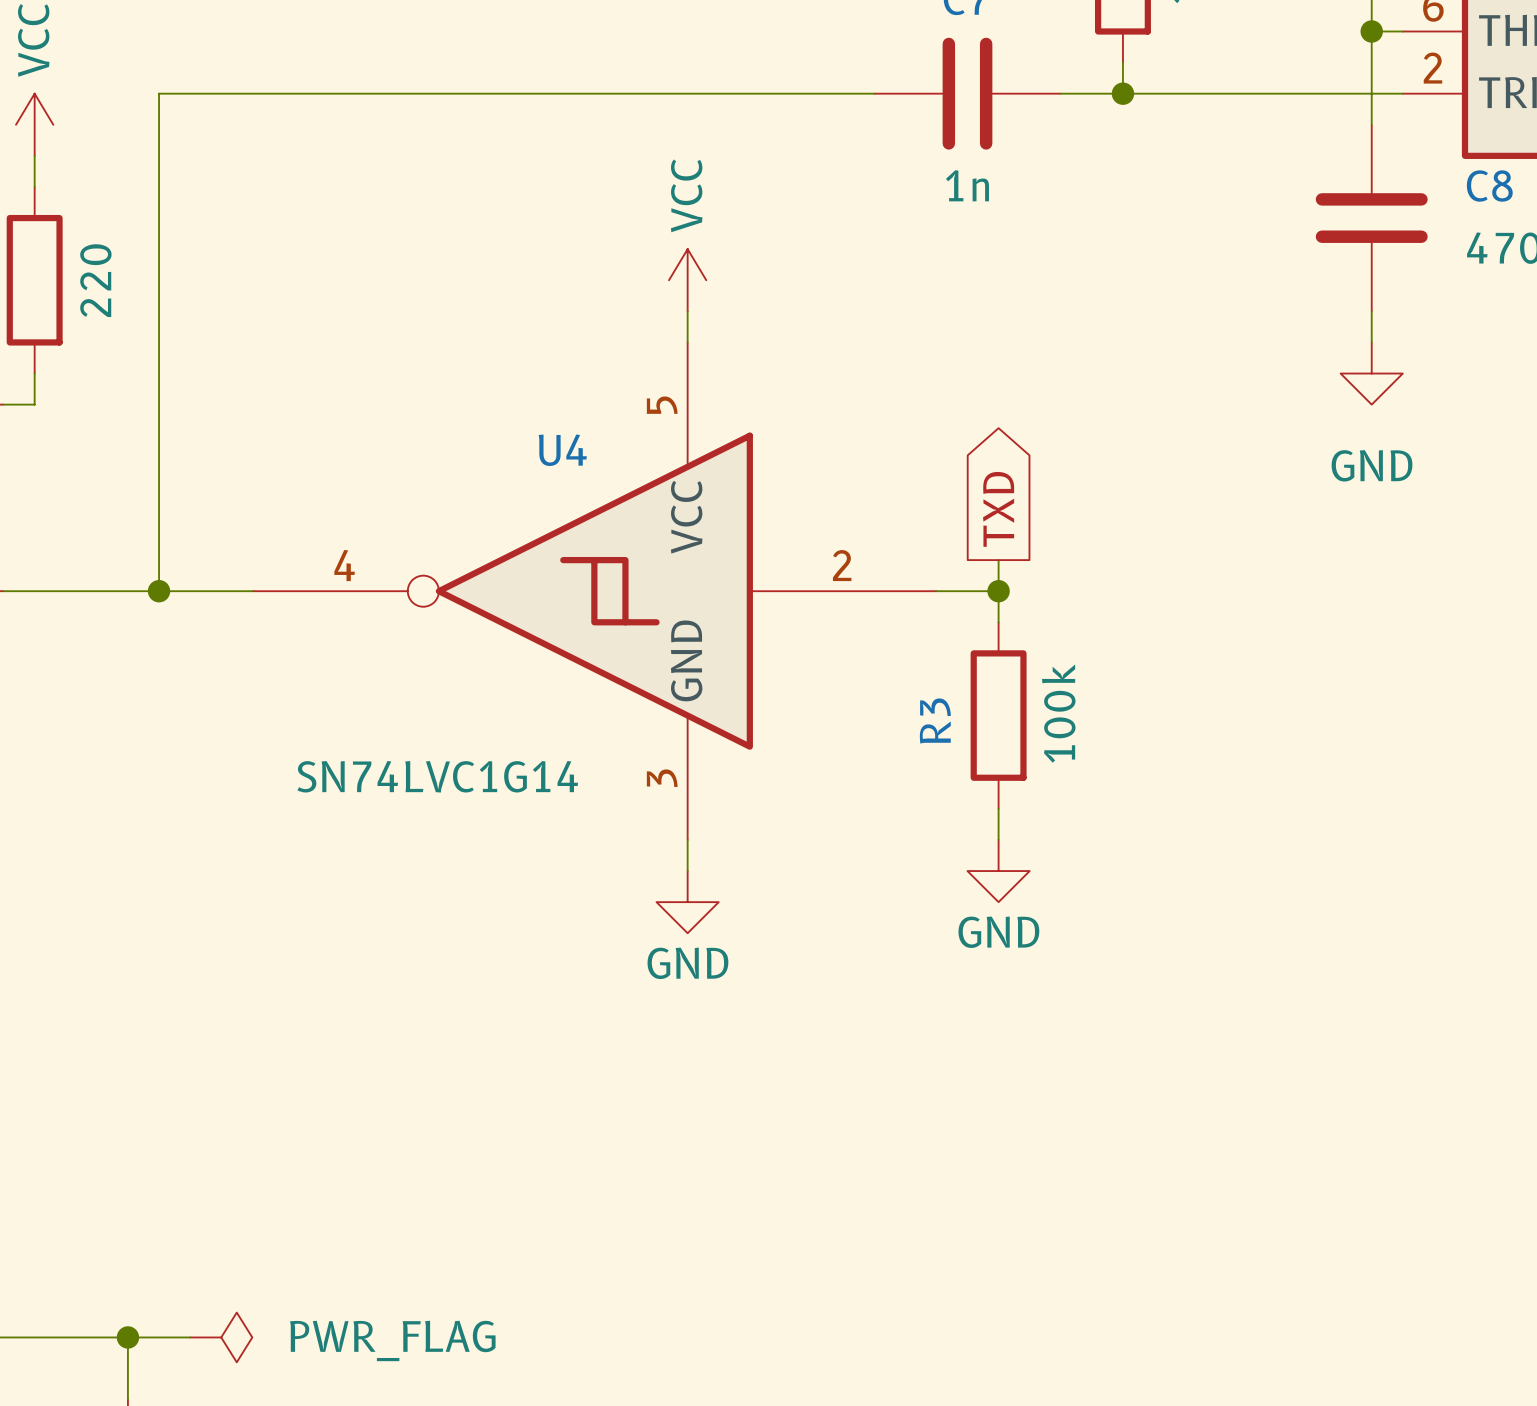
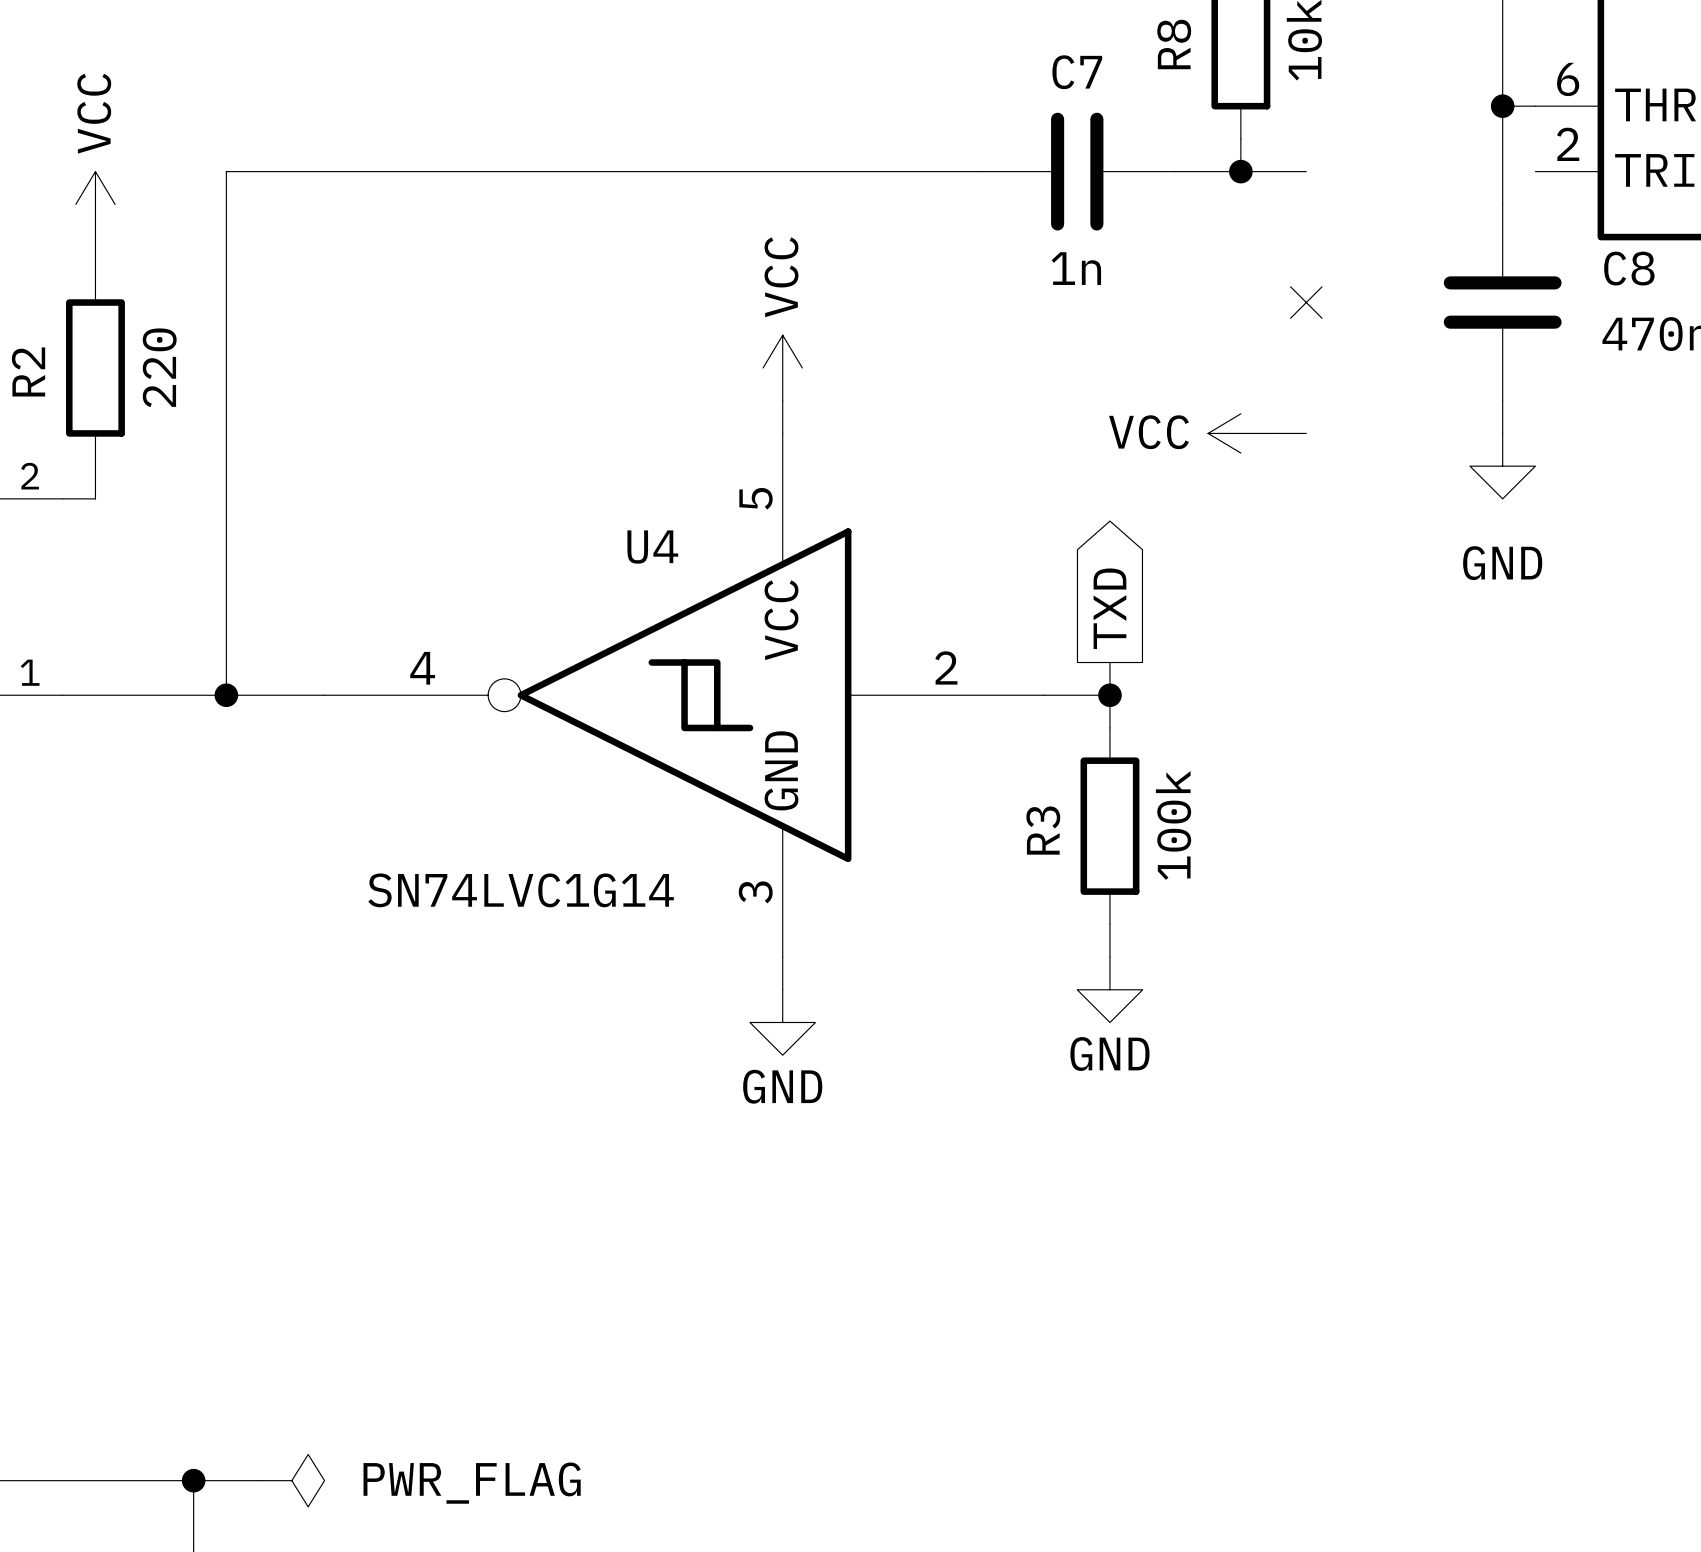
wire: (1185, 93) (1402, 93) -> none
no-connect mark: none -> (1306, 302)
power symbol: none -> VCC (1240, 433)
wire: none -> (1273, 433) (1306, 433)

